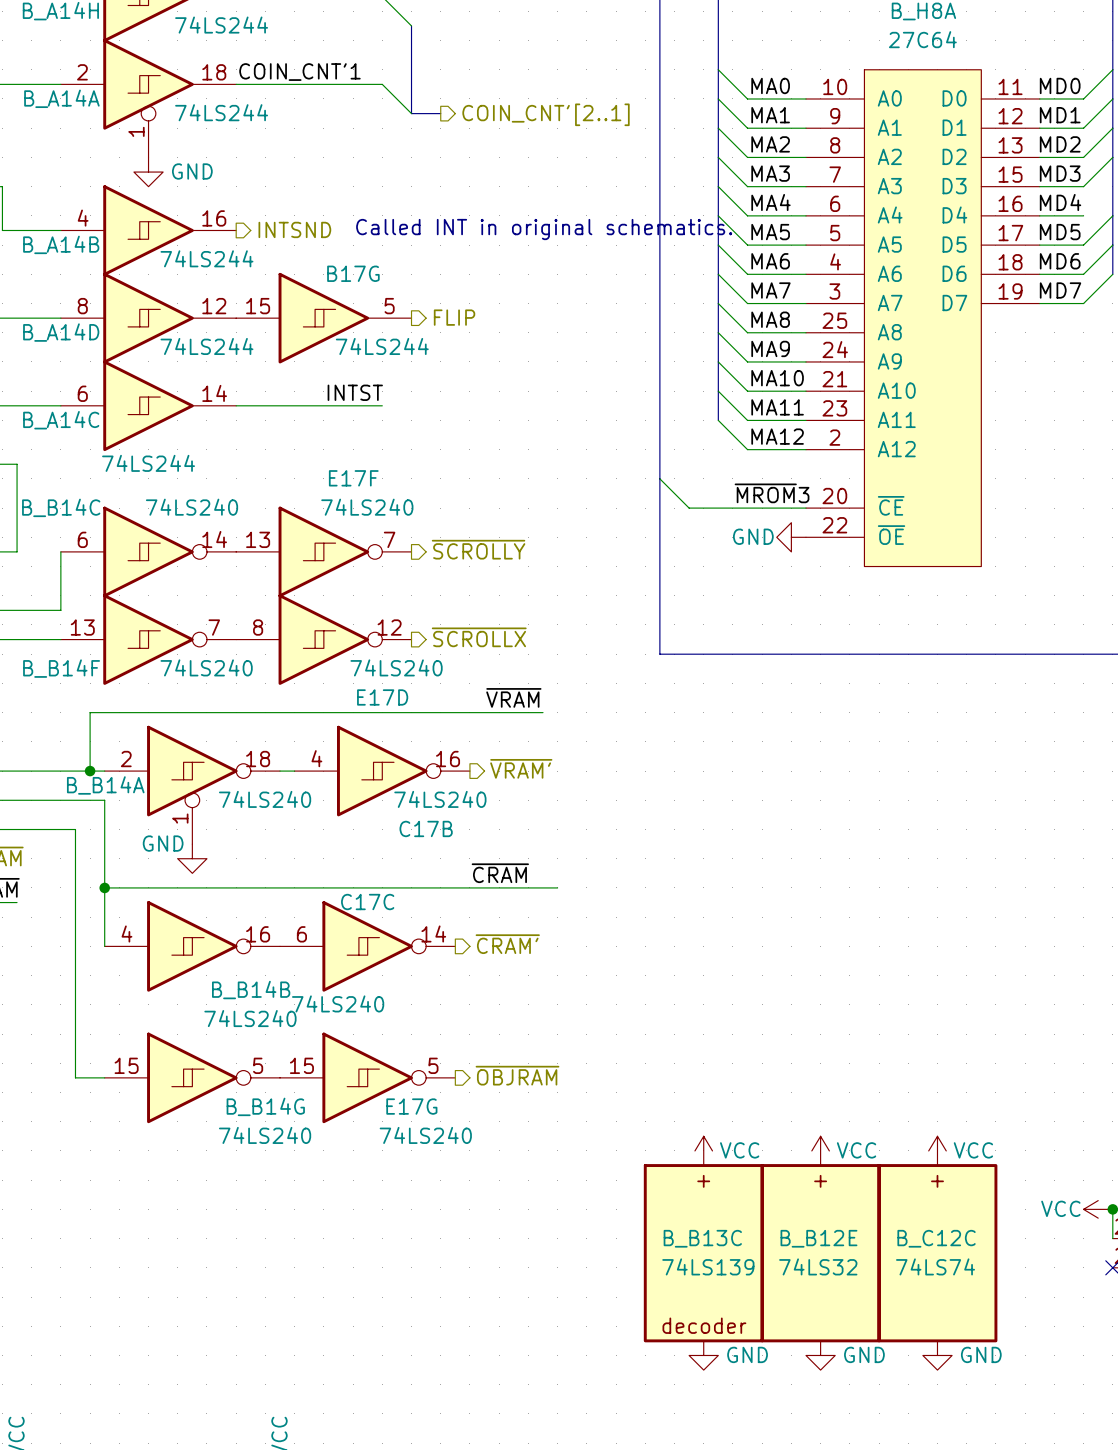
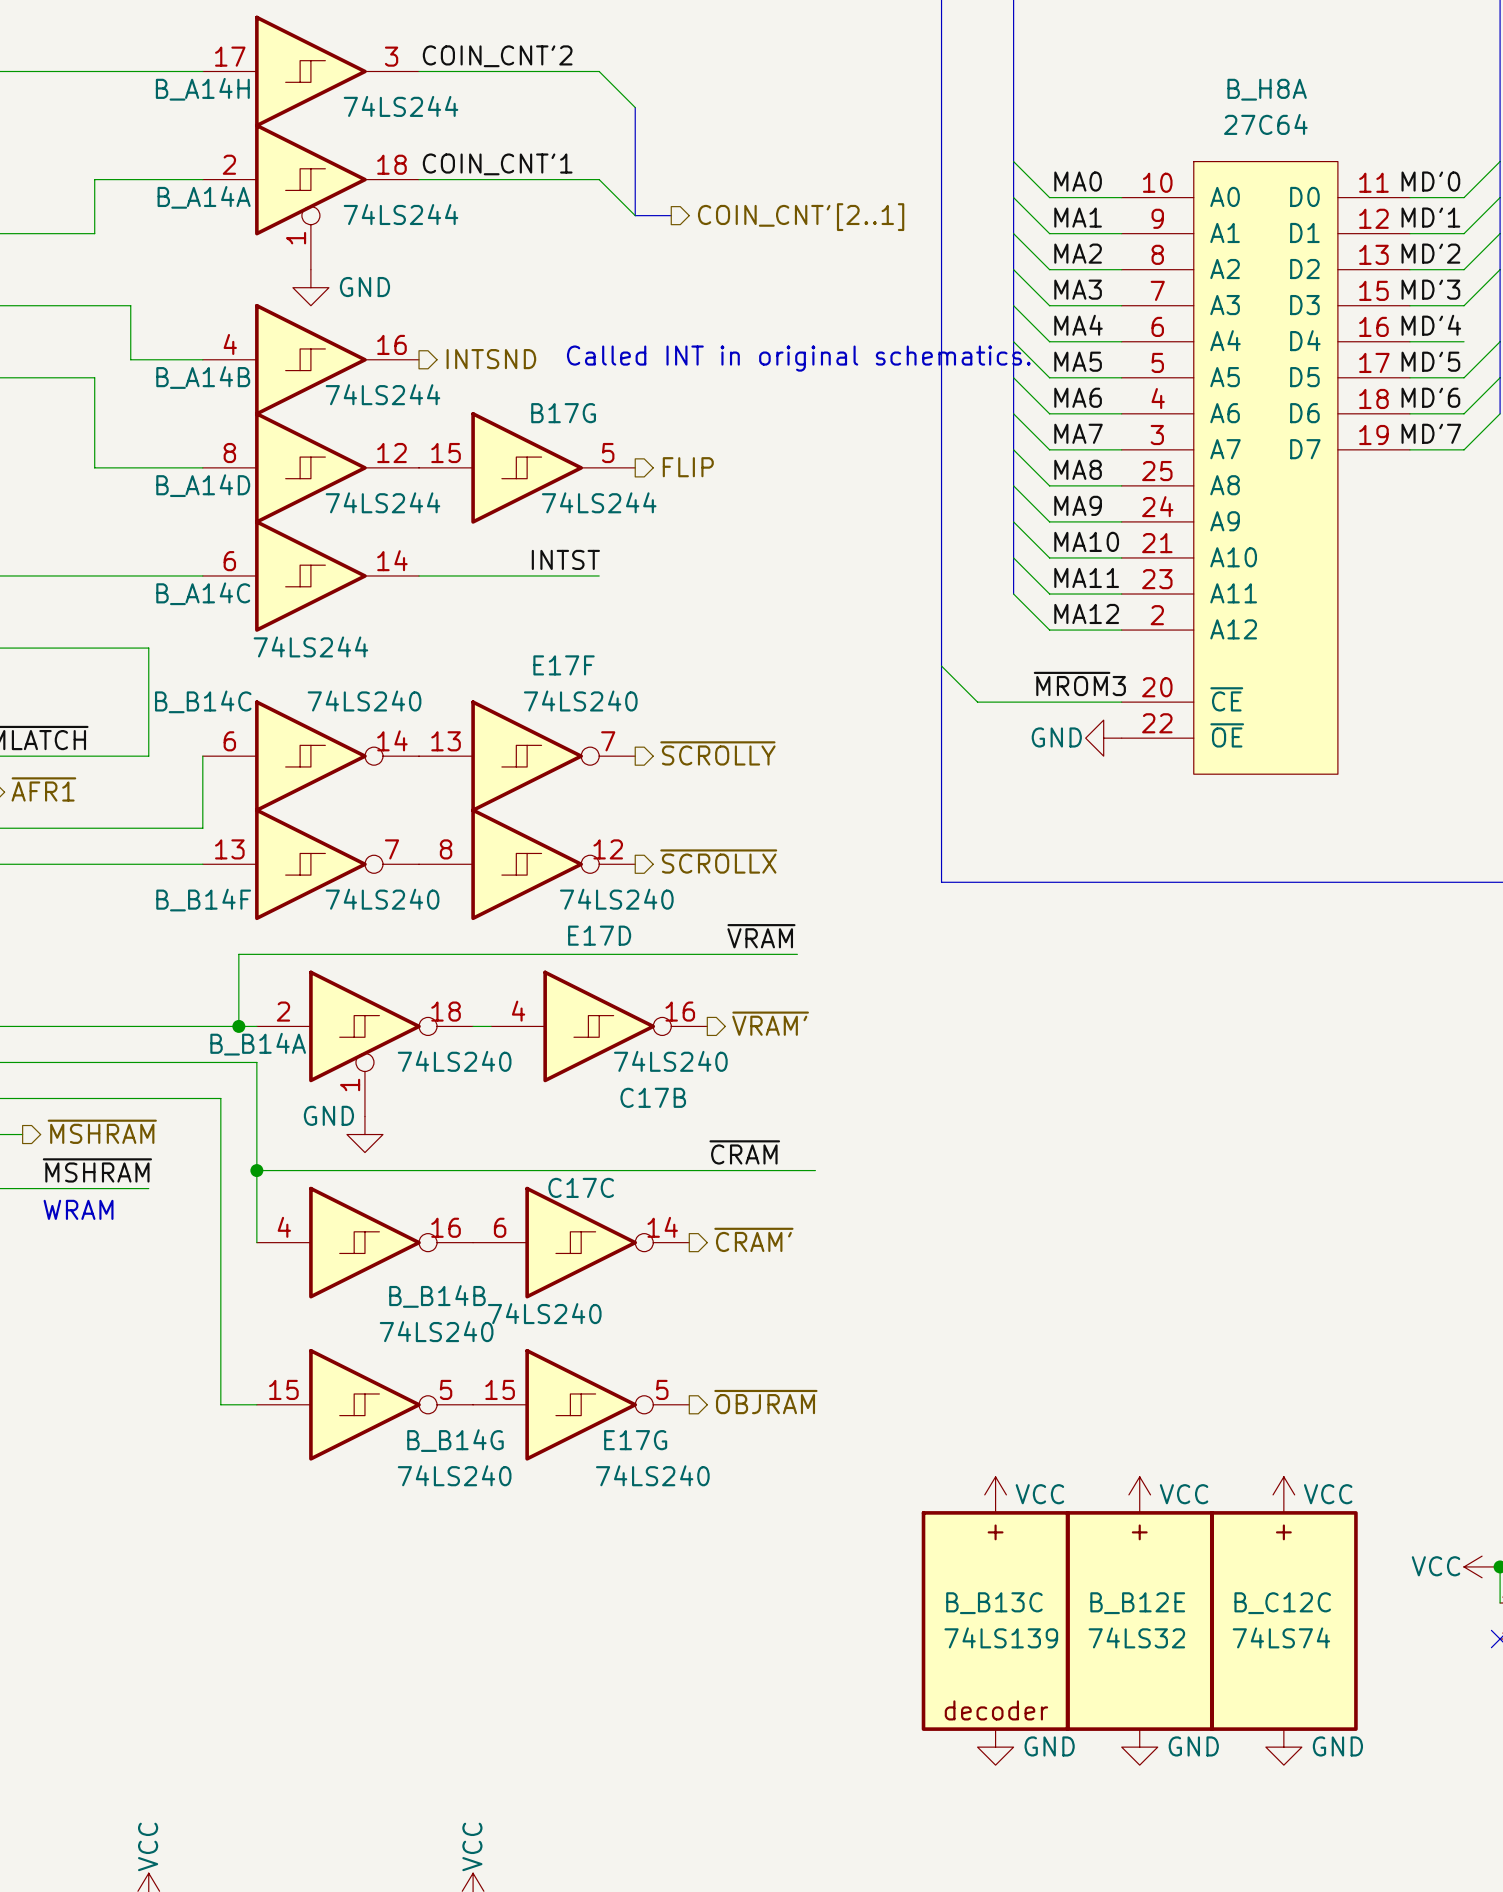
label: MD0 (1060, 85) -> MD'0 (1430, 181)
label: MD1 (1060, 115) -> MD'1 (1430, 217)
label: MD2 (1060, 144) -> MD'2 (1430, 253)
label: MD3 (1060, 173) -> MD'3 (1430, 289)
label: MD4 (1060, 202) -> MD'4 (1431, 325)
label: MD5 (1060, 232) -> MD'5 (1430, 361)
label: MD6 (1060, 261) -> MD'6 (1430, 397)
label: MD7 (1060, 290) -> MD'7 (1431, 433)

